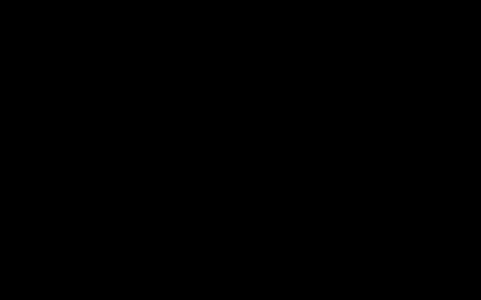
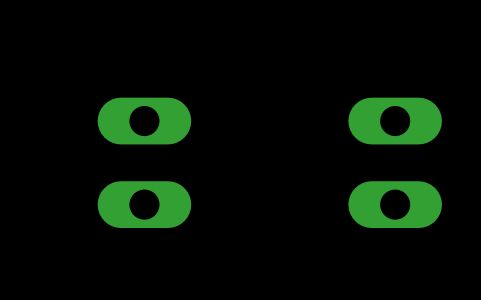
part: none -> (144, 162)
part: none -> (395, 162)

